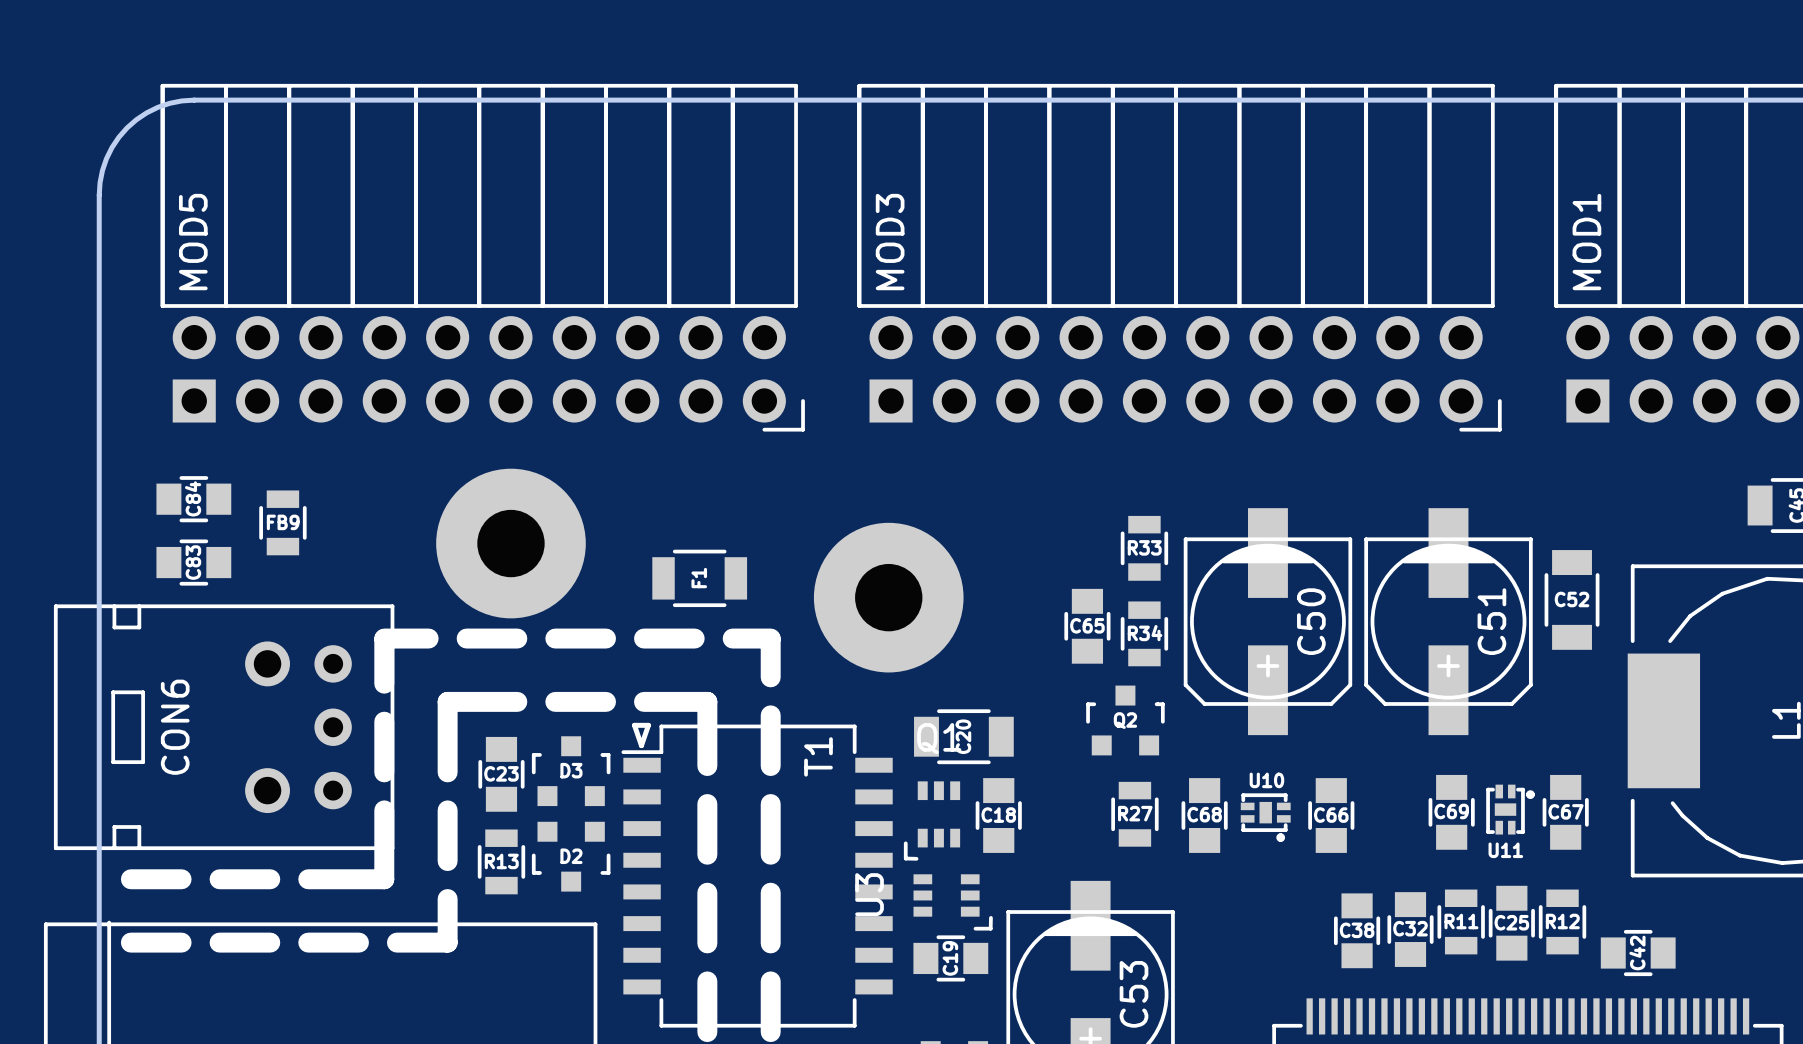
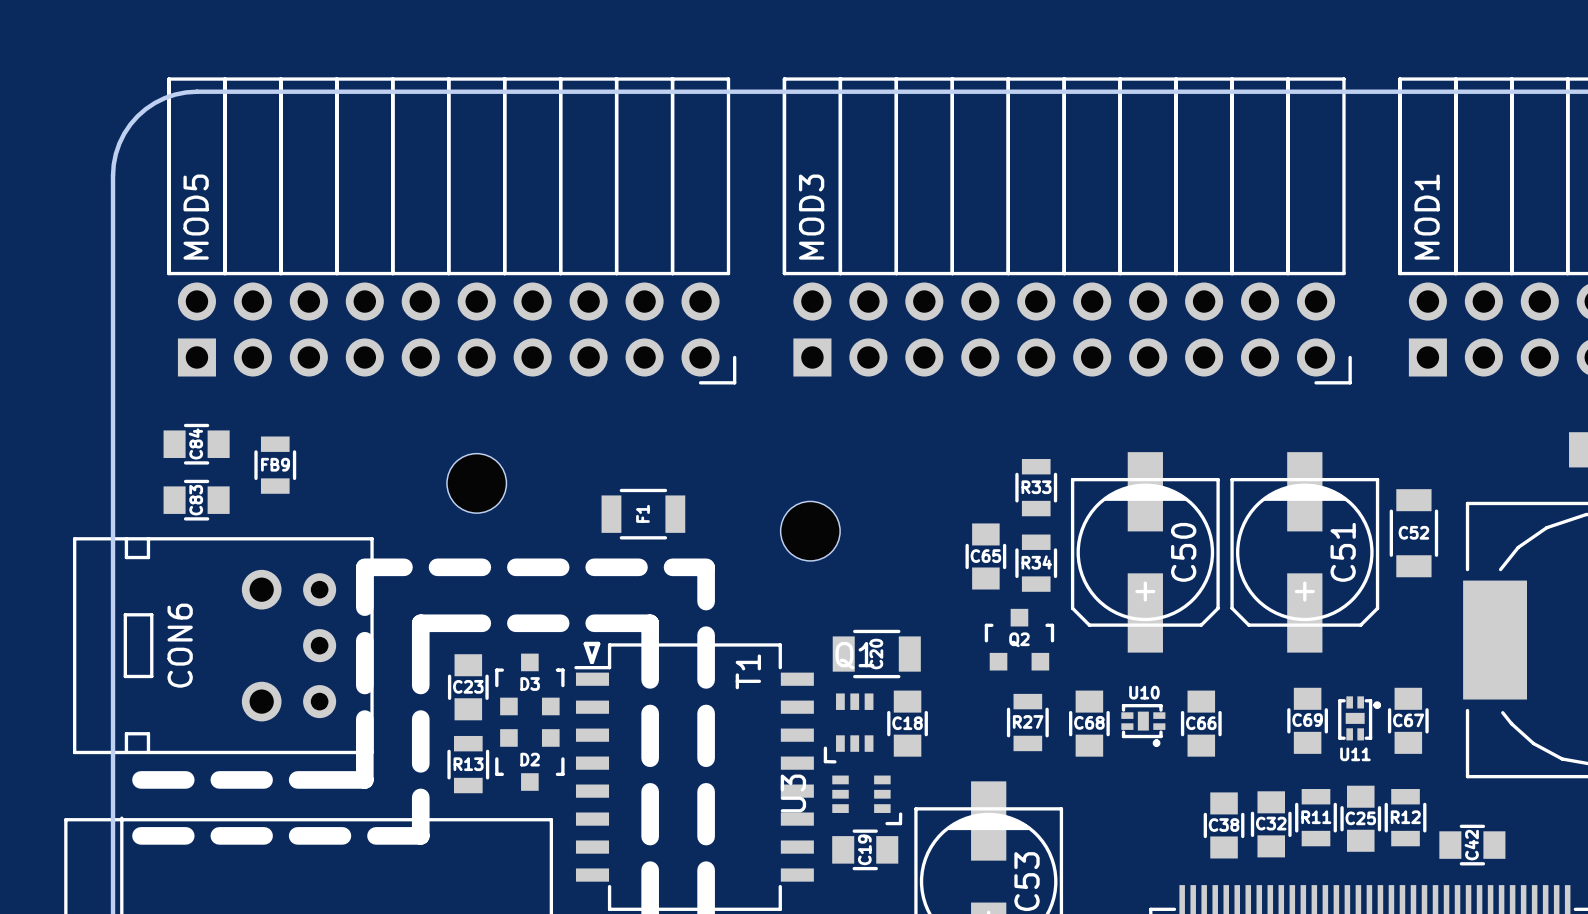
part footprint: [436, 468, 586, 619] -> [446, 453, 507, 514]
part footprint: [813, 522, 964, 673] -> [780, 501, 841, 561]

